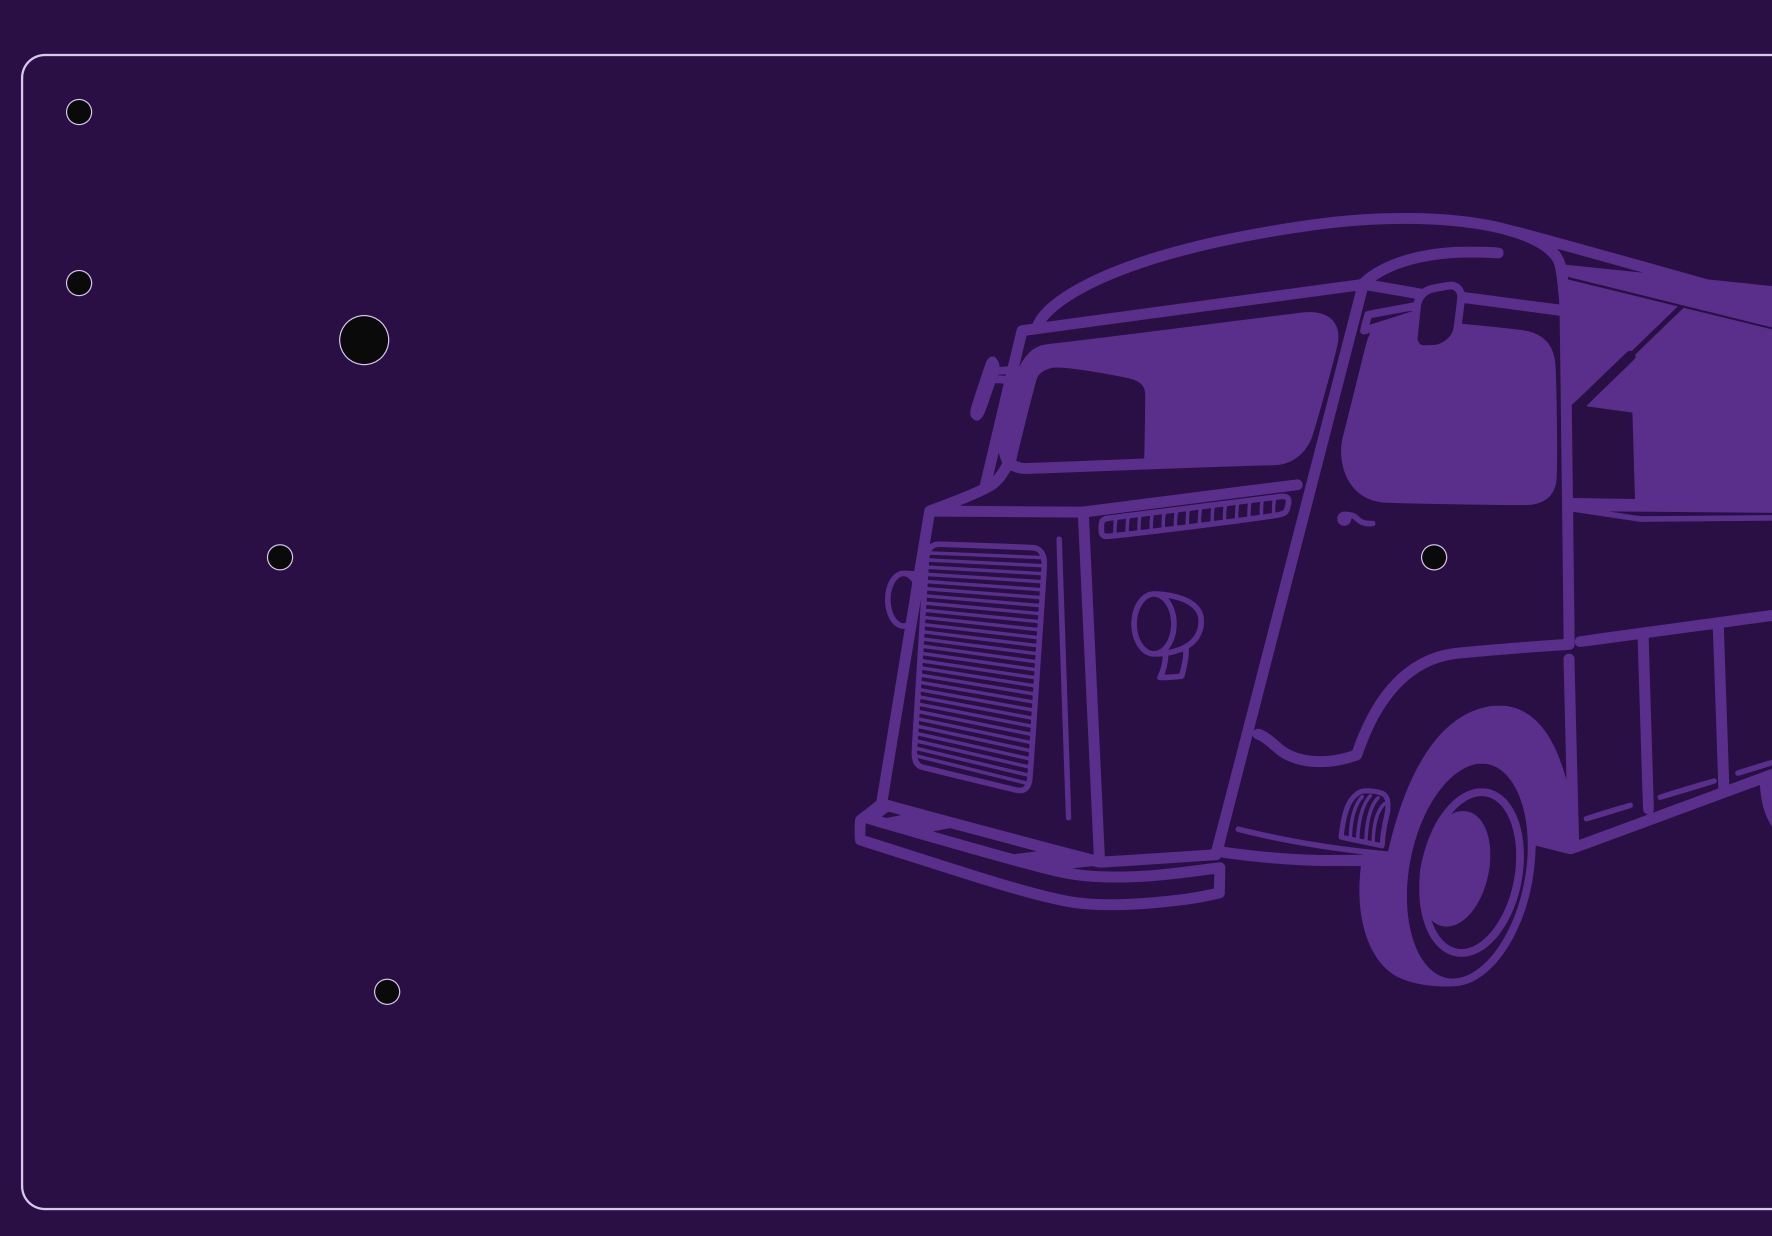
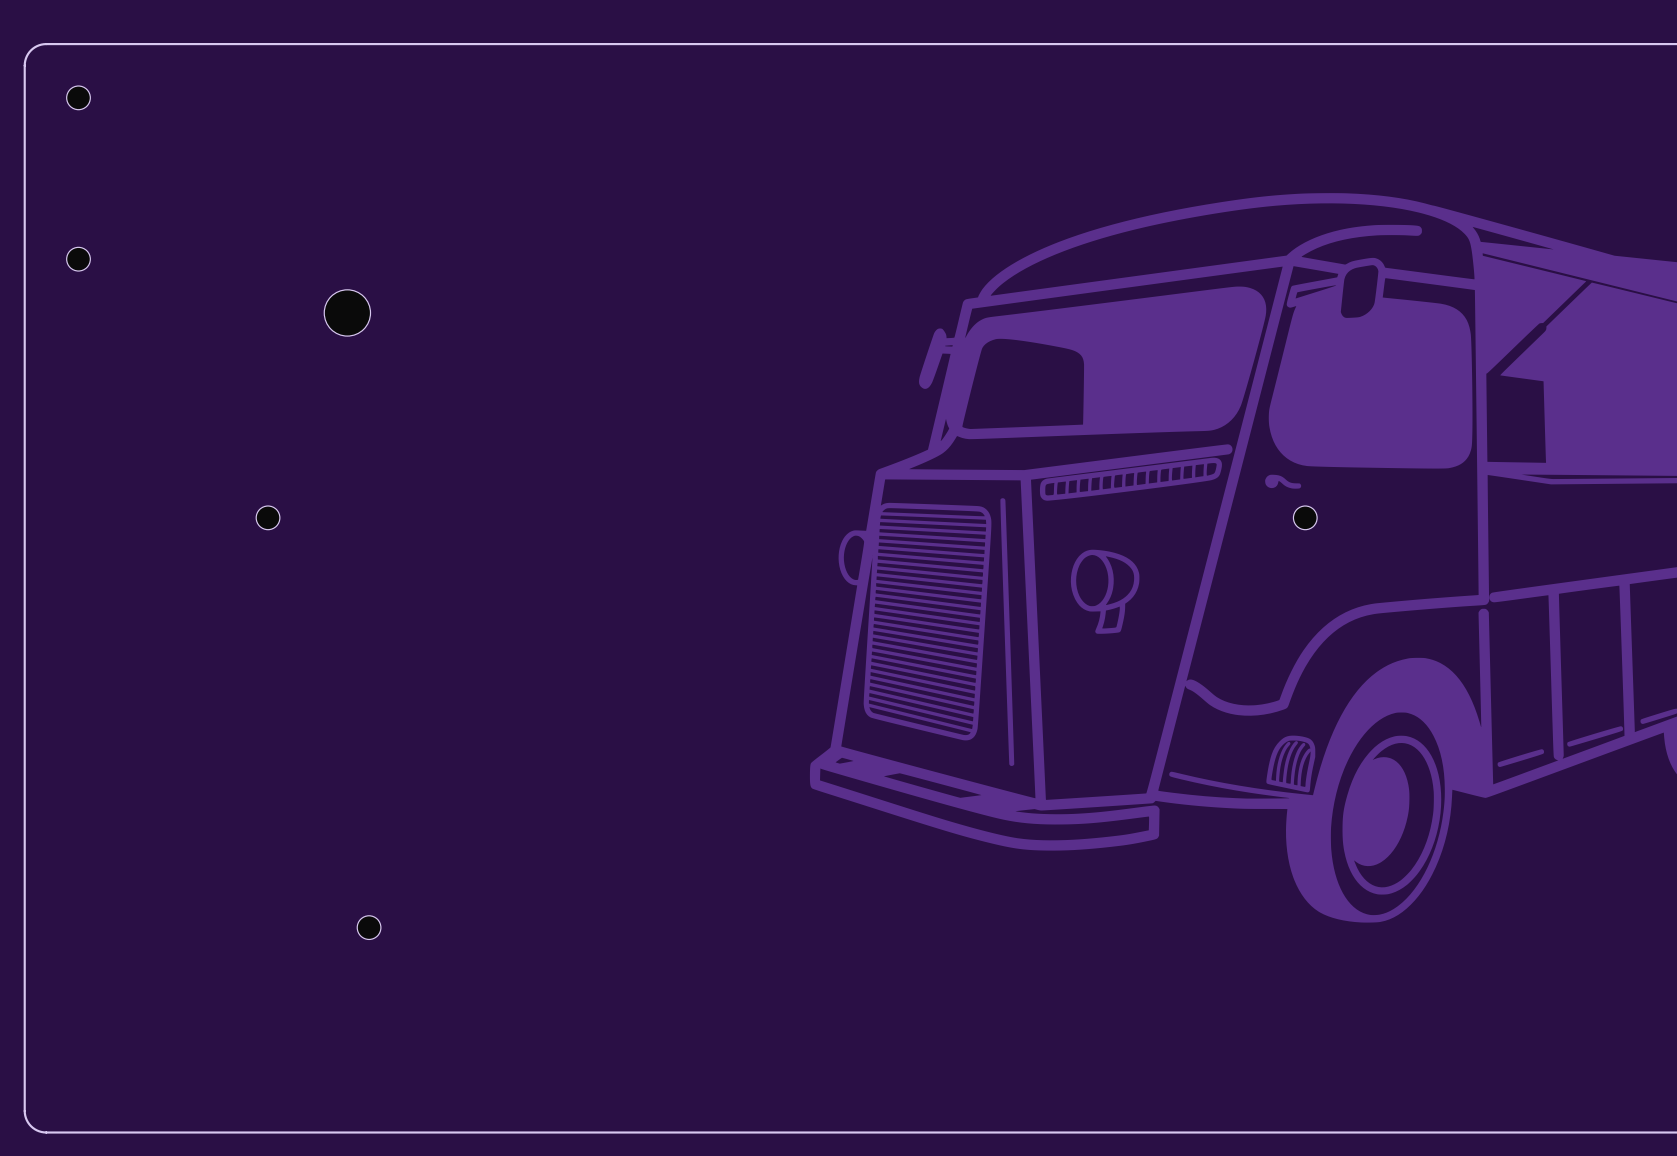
part position: (1434, 557) -> (1305, 517)

